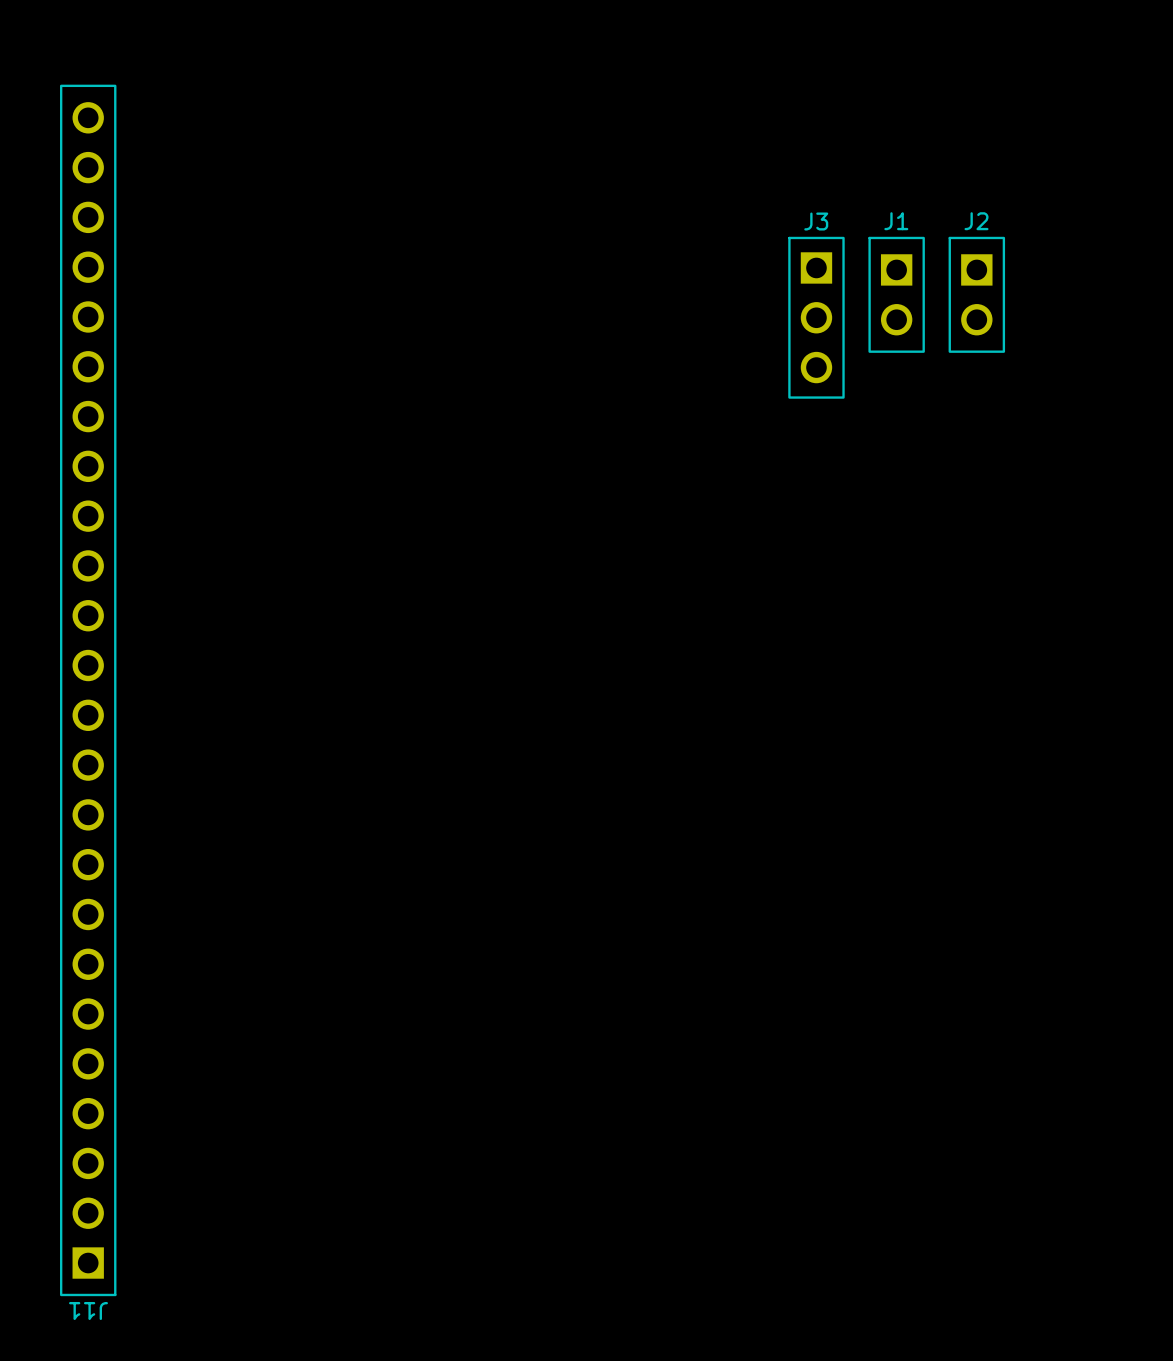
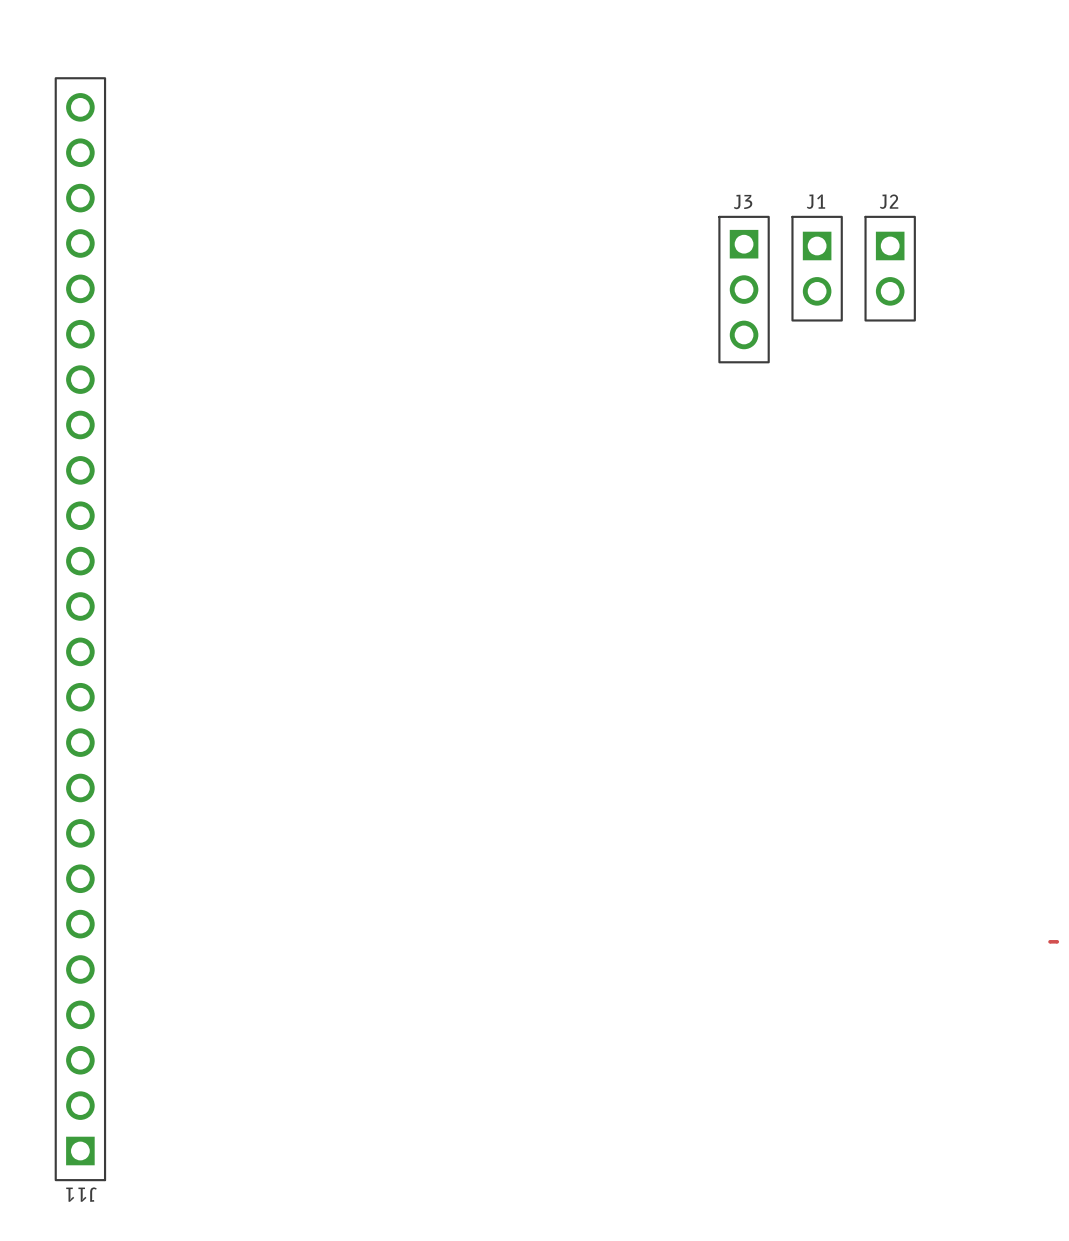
part: none -> (1053, 941)

